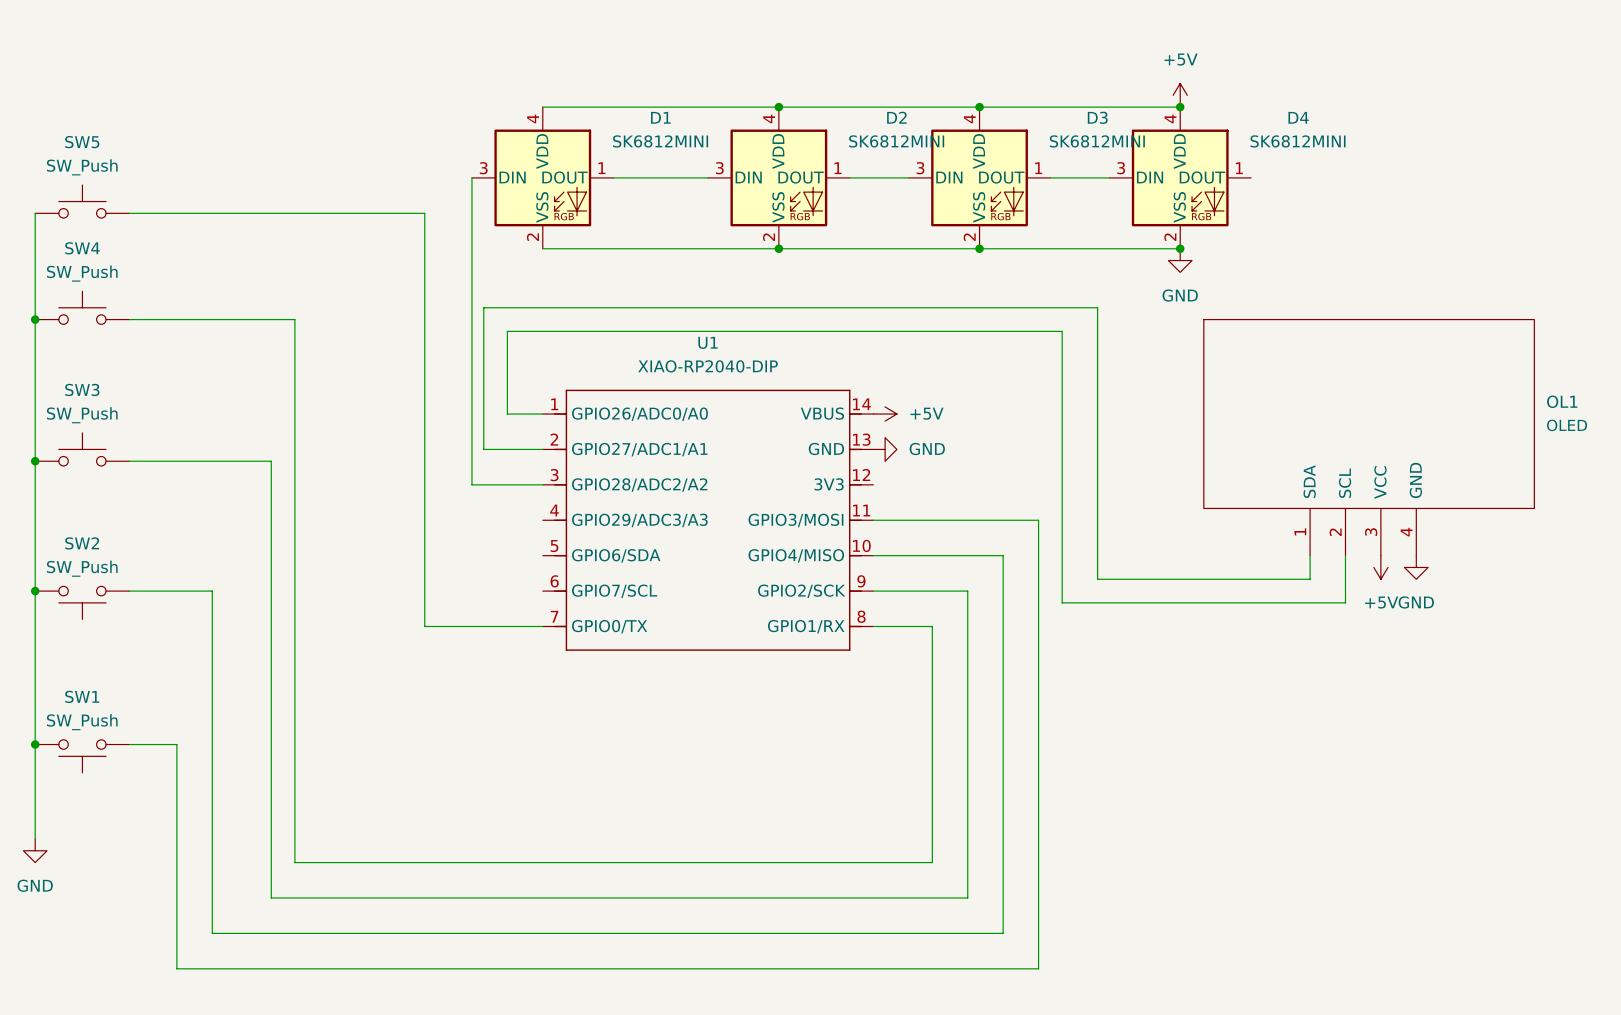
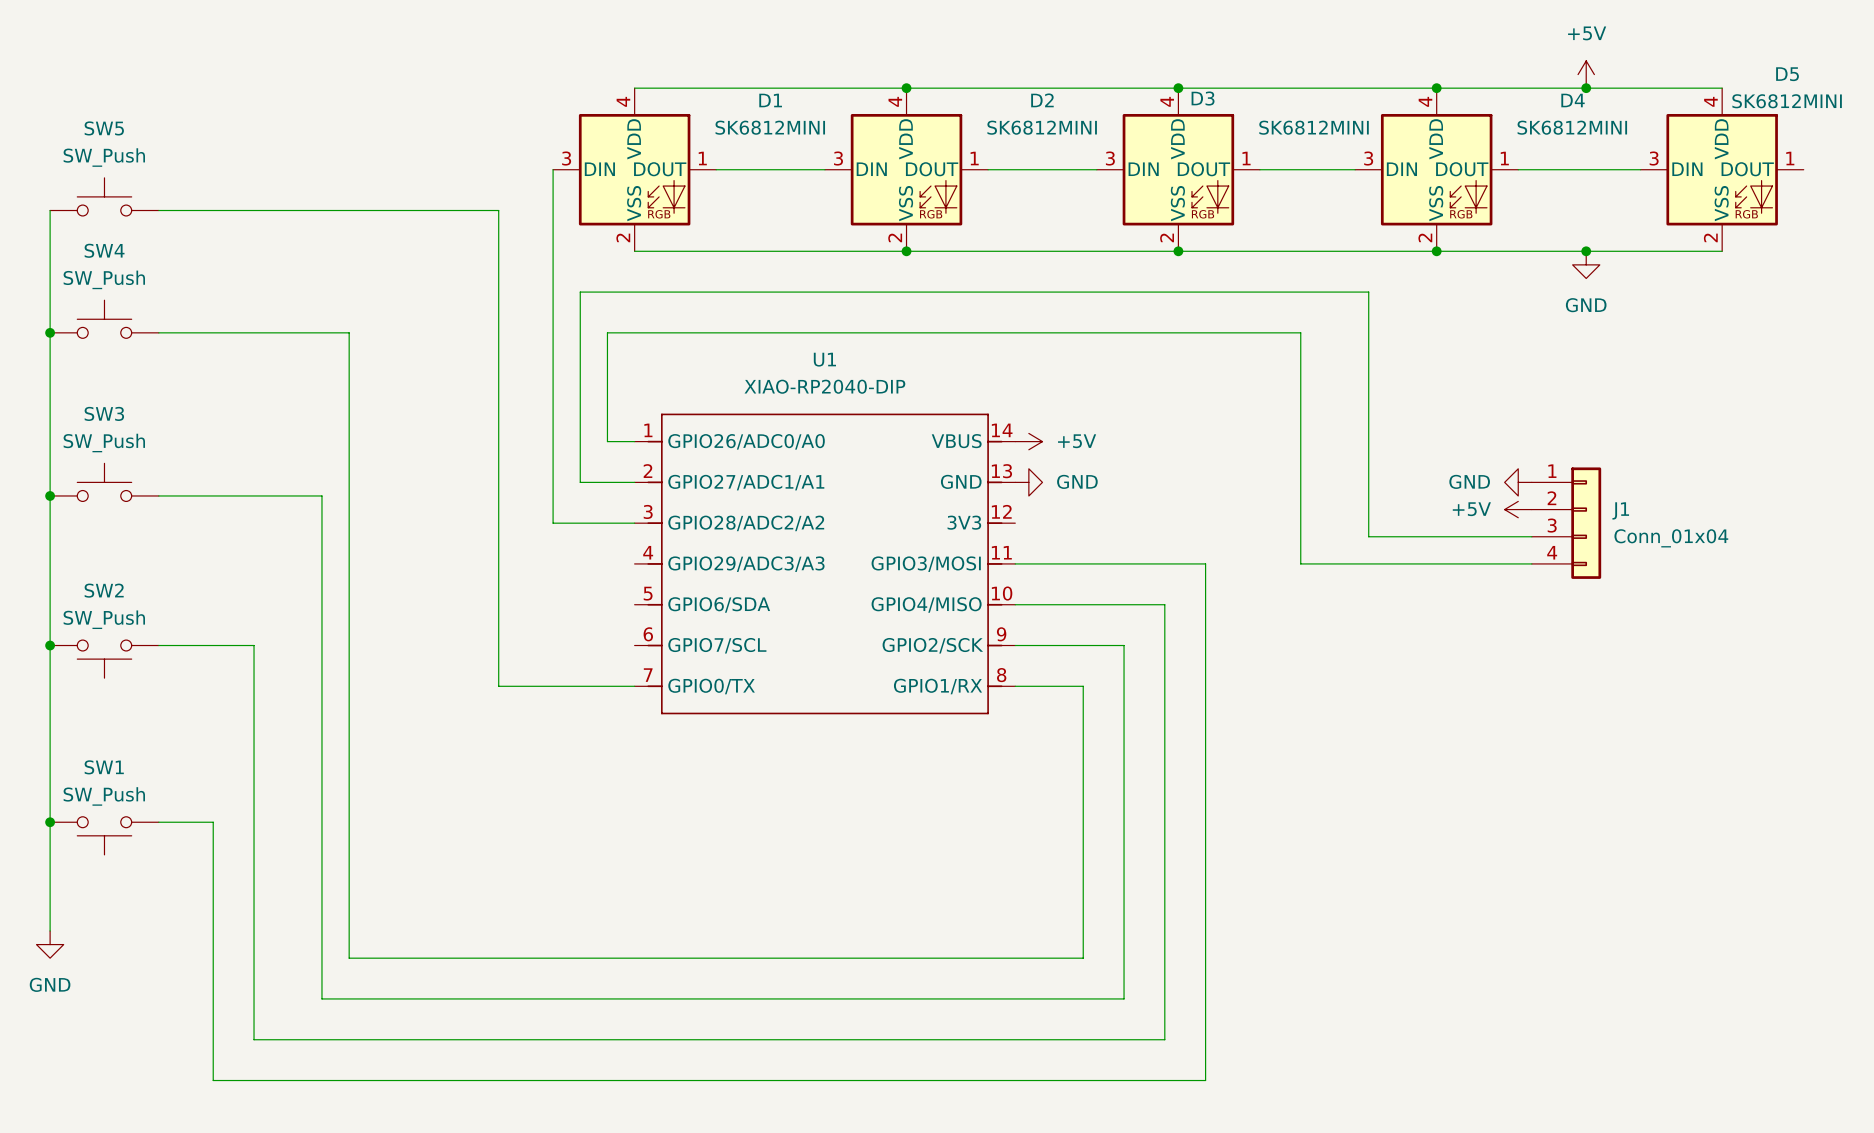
power symbol position: +5V (1180, 95) -> +5V (1586, 74)
junction position: (979, 107) -> (1178, 88)
wire: none -> (1368, 88) (1722, 88)
junction: (1180, 107) -> none
junction: none -> (1436, 88)
junction: none -> (1586, 88)
D3 name position: D3 (1097, 117) -> D3 (1203, 98)
D3 position: (979, 177) -> (1178, 169)
D4 position: (1180, 177) -> (1436, 169)
wire: none -> (1518, 169) (1640, 169)
D5: none -> SK6812MINI (1722, 169)
junction position: (979, 248) -> (1178, 251)
wire: none -> (1368, 251) (1722, 251)
junction: (1180, 248) -> none
junction: none -> (1436, 251)
junction: none -> (1586, 251)
power symbol: GND (1180, 260) -> none
power symbol: none -> GND (1586, 264)
wire: (519, 414) (507, 414) (507, 331) (1062, 331) (1062, 602) (1345, 602) (1345, 555) -> (607, 441) (607, 332) (1300, 332) (1300, 563) (1531, 563)
OL1: OLED (1369, 437) -> none
wire: (495, 449) (483, 449) (483, 307) (1097, 307) (1097, 579) (1310, 579) (1310, 555) -> (580, 482) (580, 292) (1368, 292) (1368, 536) (1531, 536)
power symbol: none -> GND (1518, 482)
J1: none -> Conn_01x04 (1566, 523)
power symbol rotation: 0° (1380, 567) -> 90° clockwise (1518, 509)
power symbol position: +5V (1380, 567) -> +5V (1518, 509)
power symbol: GND (1416, 567) -> none

